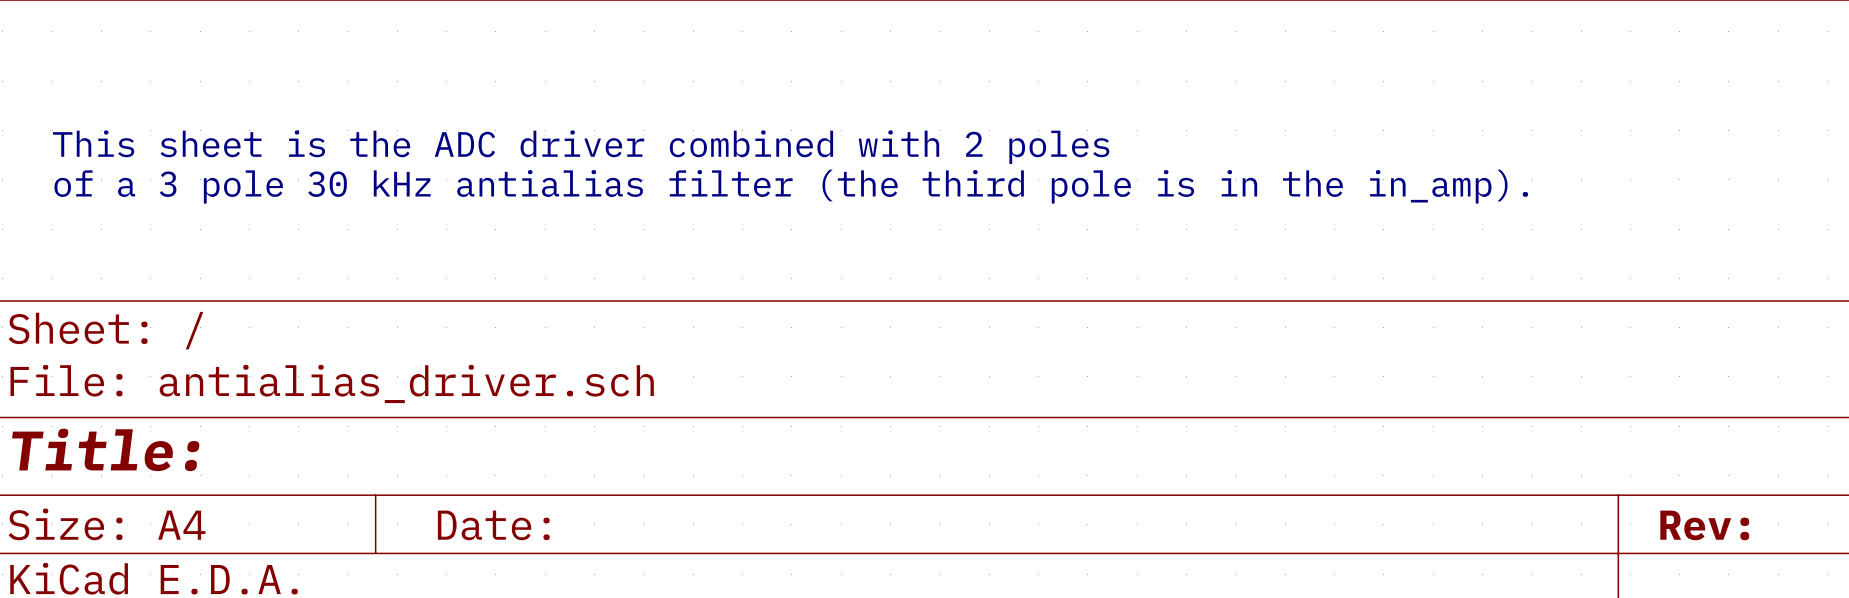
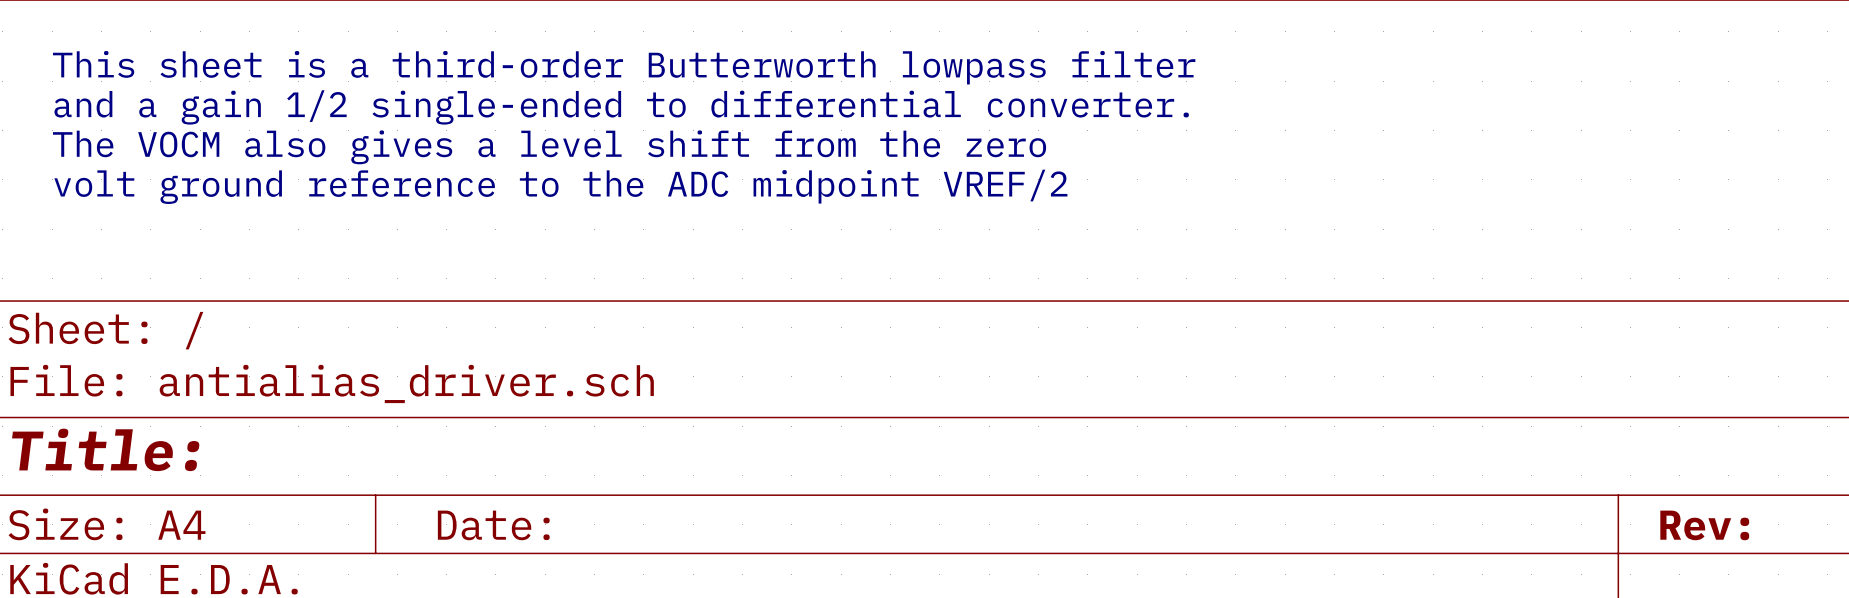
text: none -> This sheet is a third-order Butterworth lowpass filter (624, 67)
text: none -> and a gain 1/2 single-ended to differential converter. (621, 107)
text: This sheet is the ADC driver combined with 2 poles (581, 147) -> The VOCM also gives a level shift from the zero (549, 147)
text: of a 3 pole 30 kHz antialias filter (the third pole is in the in_amp). (791, 186) -> volt ground reference to the ADC midpoint VREF/2 (560, 186)

